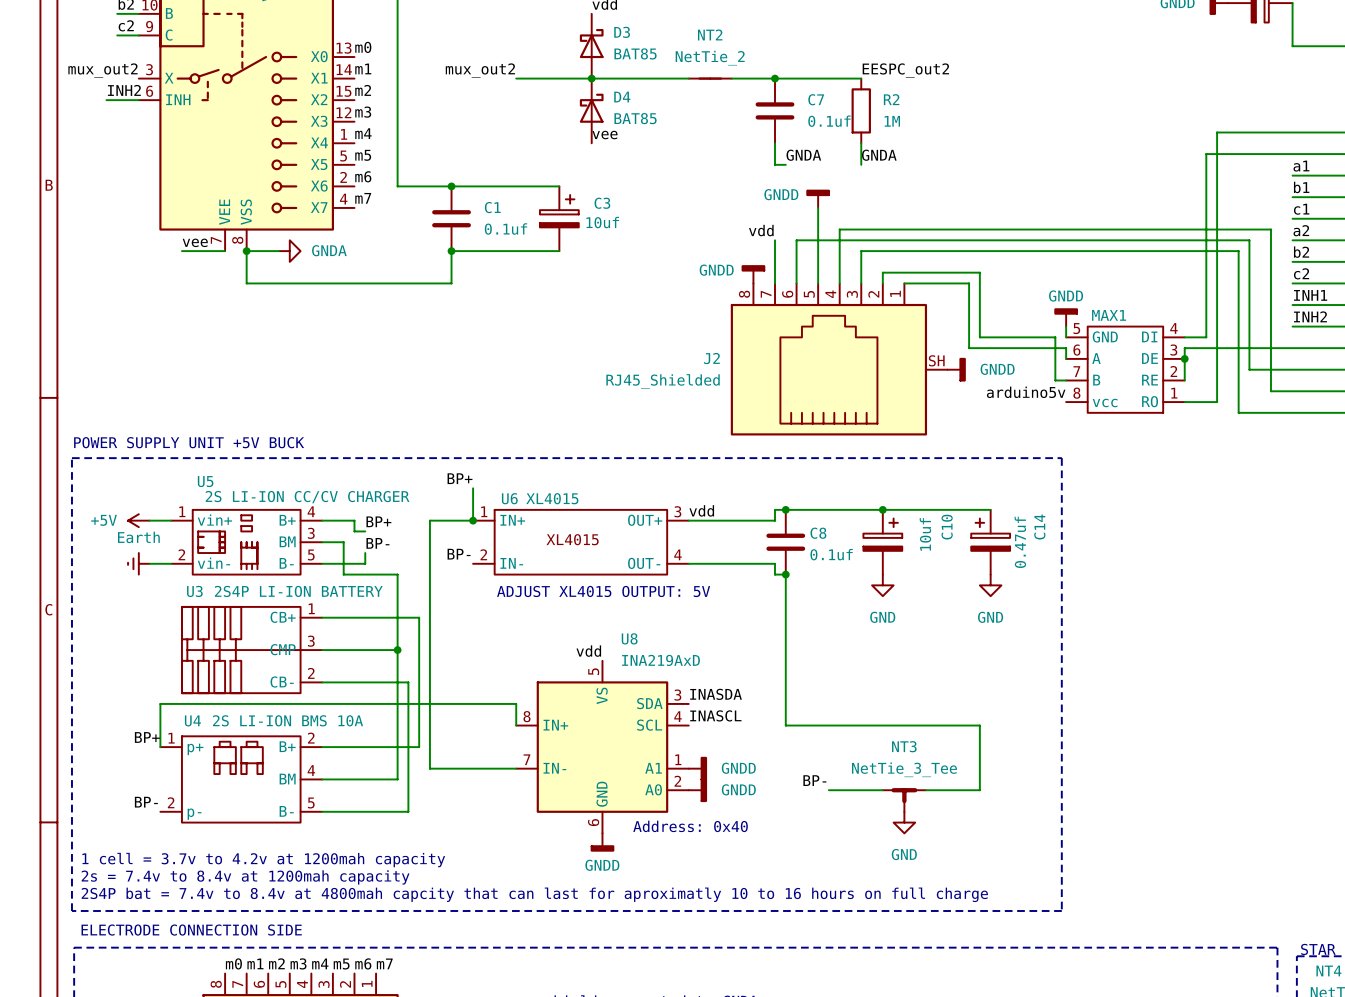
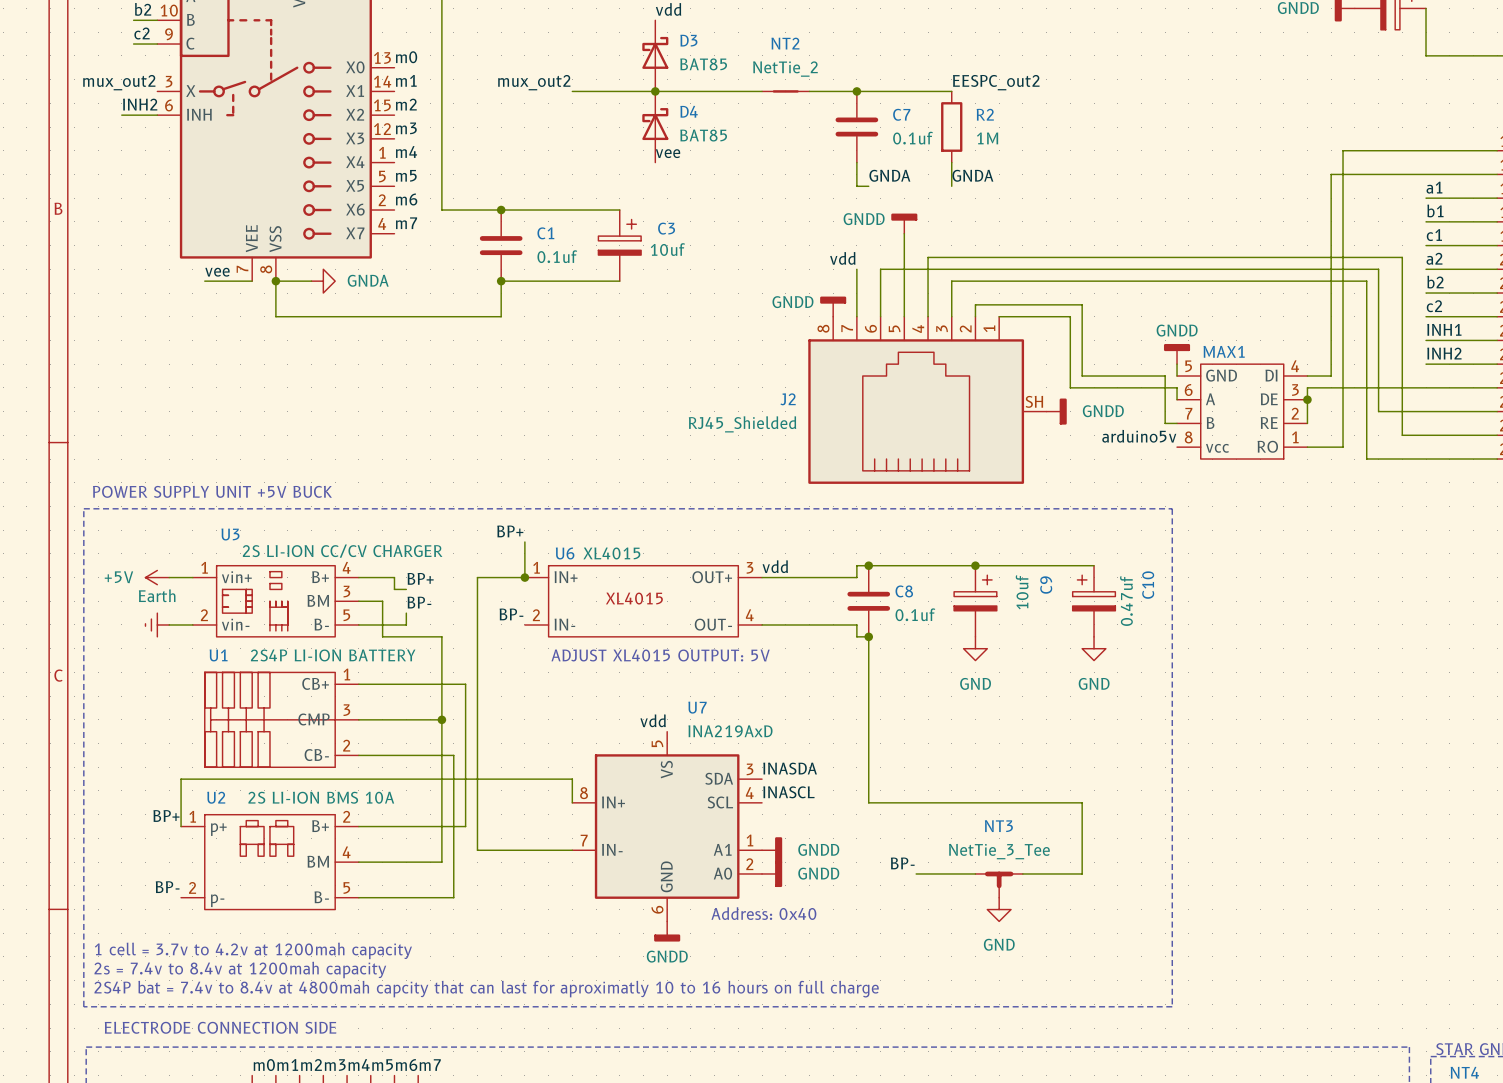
U5 name: U5 (205, 481) -> U3 (230, 534)
C14 name: C14 (1039, 526) -> C10 (1148, 585)
C10 name: C10 (947, 527) -> C9 (1046, 585)
U3 name: U3 (194, 591) -> U1 (218, 655)
U8 name: U8 (629, 638) -> U7 (697, 707)
U4 name: U4 (192, 720) -> U2 (216, 797)

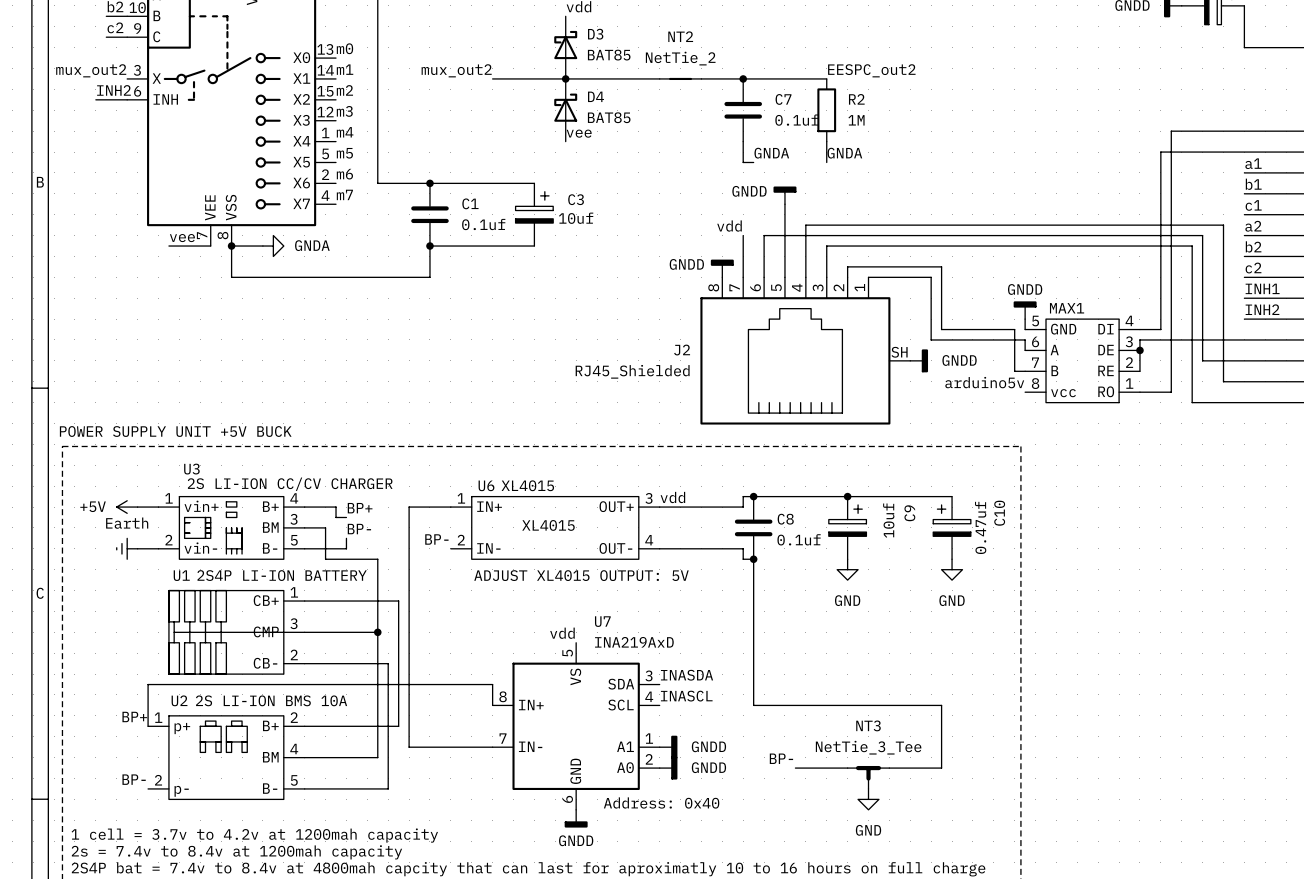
label: BP+ (510, 531) -> none
wire: (524, 541) (524, 577) -> none
junction: (524, 577) -> none

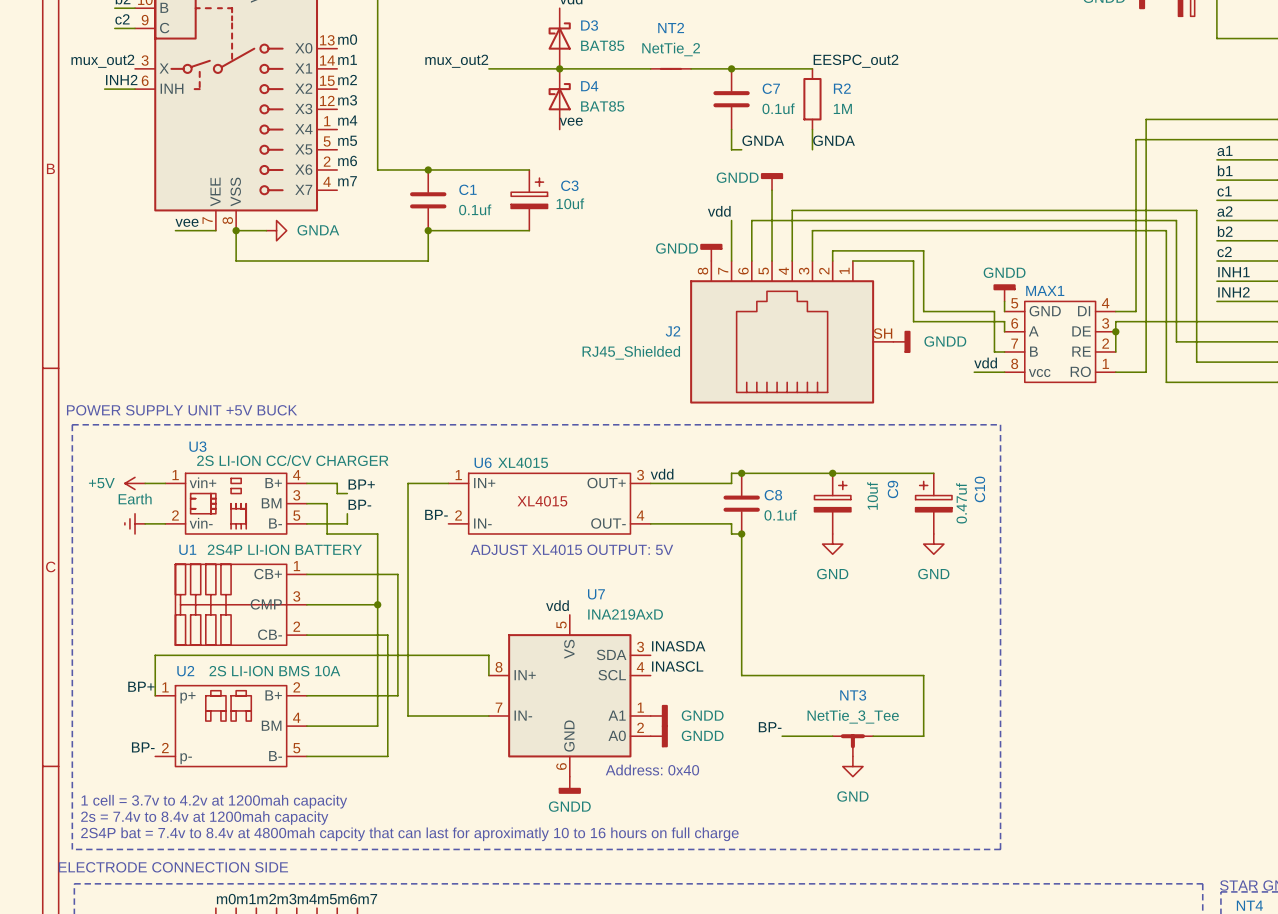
label: arduino5v (984, 382) -> none
label: none -> vdd (985, 362)
wire: none -> (974, 372) (1004, 372)

